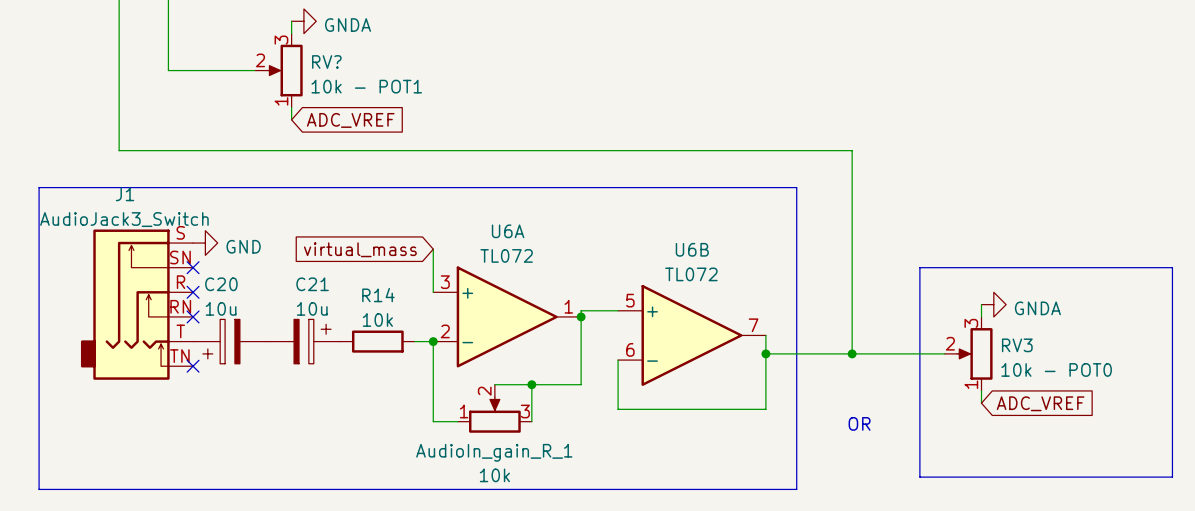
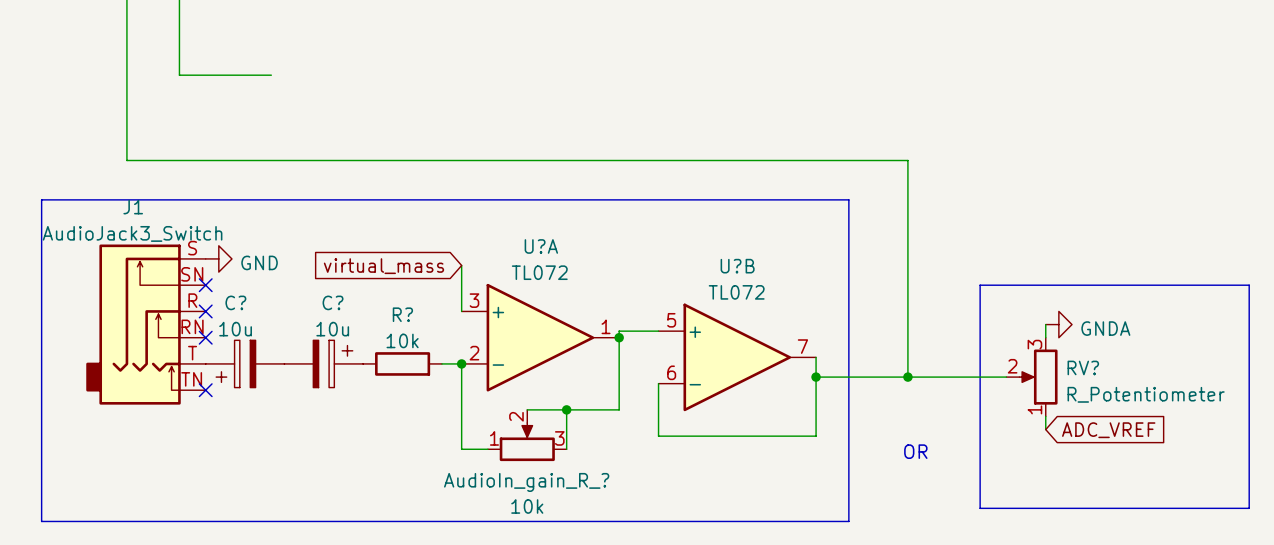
wire: (291, 21) (291, 33) -> none
power symbol: GNDA (303, 21) -> none
RV?: 10k - POT1 (278, 70) -> none
wire: (291, 107) (291, 119) -> none
global label: ADC_VREF (350, 120) -> none
U6A name: U6A (508, 231) -> U?A (541, 246)
U6B name: U6B (692, 249) -> U?B (737, 266)
C20 name: C20 (221, 284) -> C? (235, 302)
C21 name: C21 (312, 284) -> C? (333, 302)
R14 name: R14 (378, 295) -> R? (402, 314)
RV3 name: RV3 (1017, 345) -> RV? (1083, 367)
RV3 value: 10k - POT0 (1056, 369) -> R_Potentiometer (1146, 394)
AudioIn_gain_R_1 name: AudioIn_gain_R_1 (494, 452) -> AudioIn_gain_R_? (526, 482)

